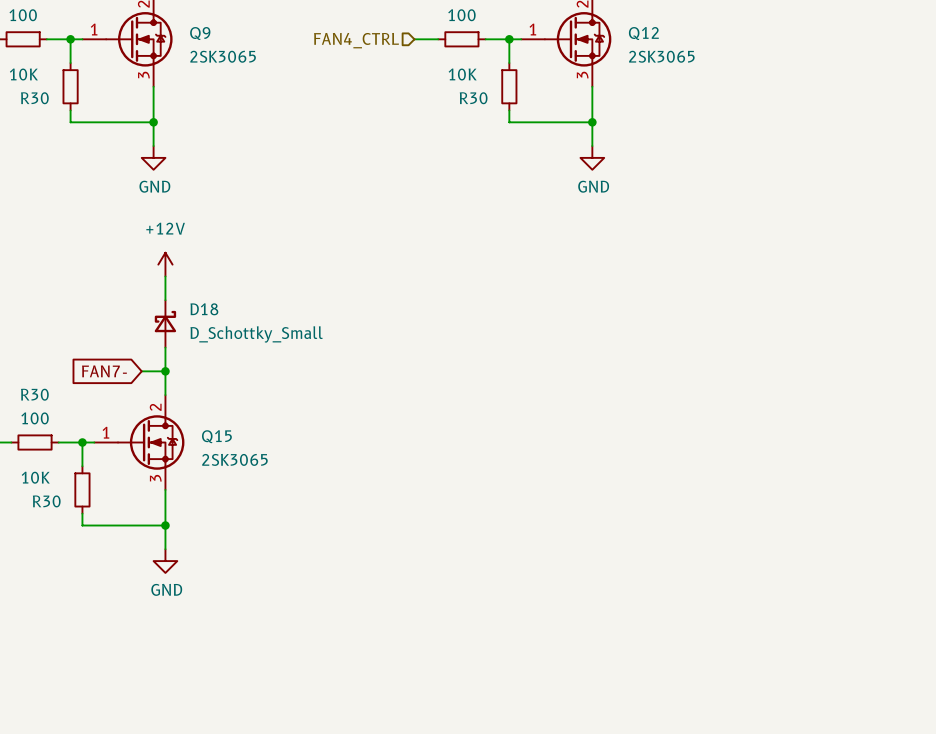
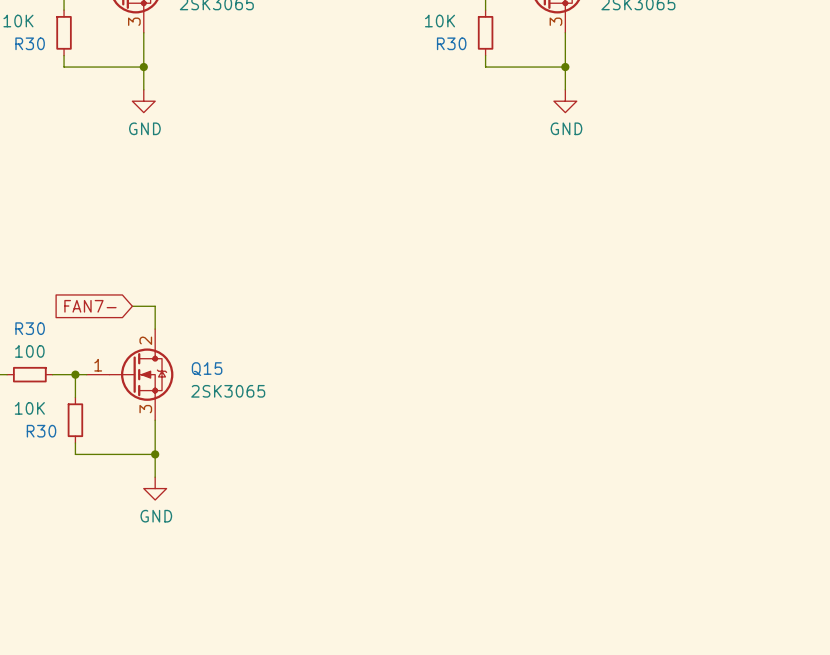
power symbol: +12V (165, 264) -> none
wire: (165, 276) (165, 300) -> none
D18: D_Schottky_Small (165, 323) -> none
wire: (165, 347) (165, 371) -> none
junction: (165, 371) -> none

